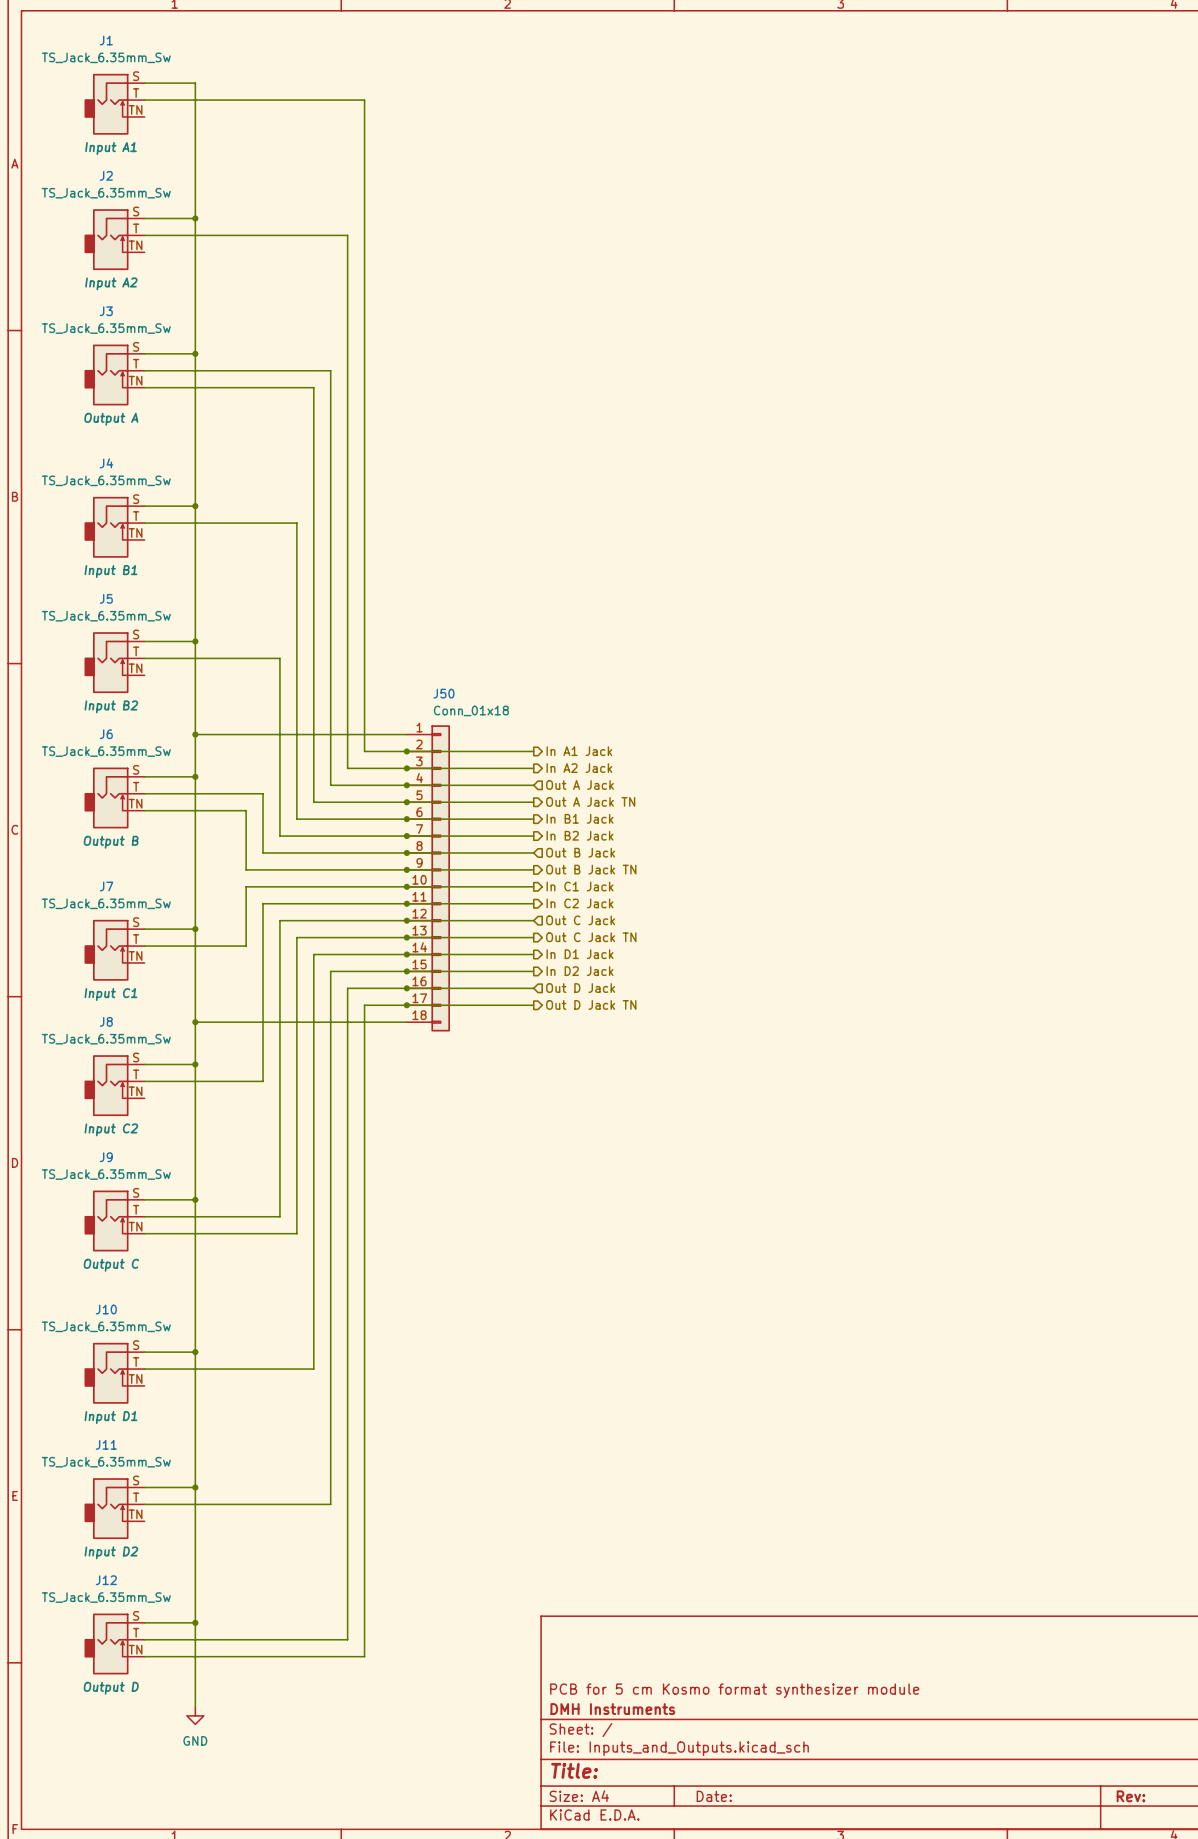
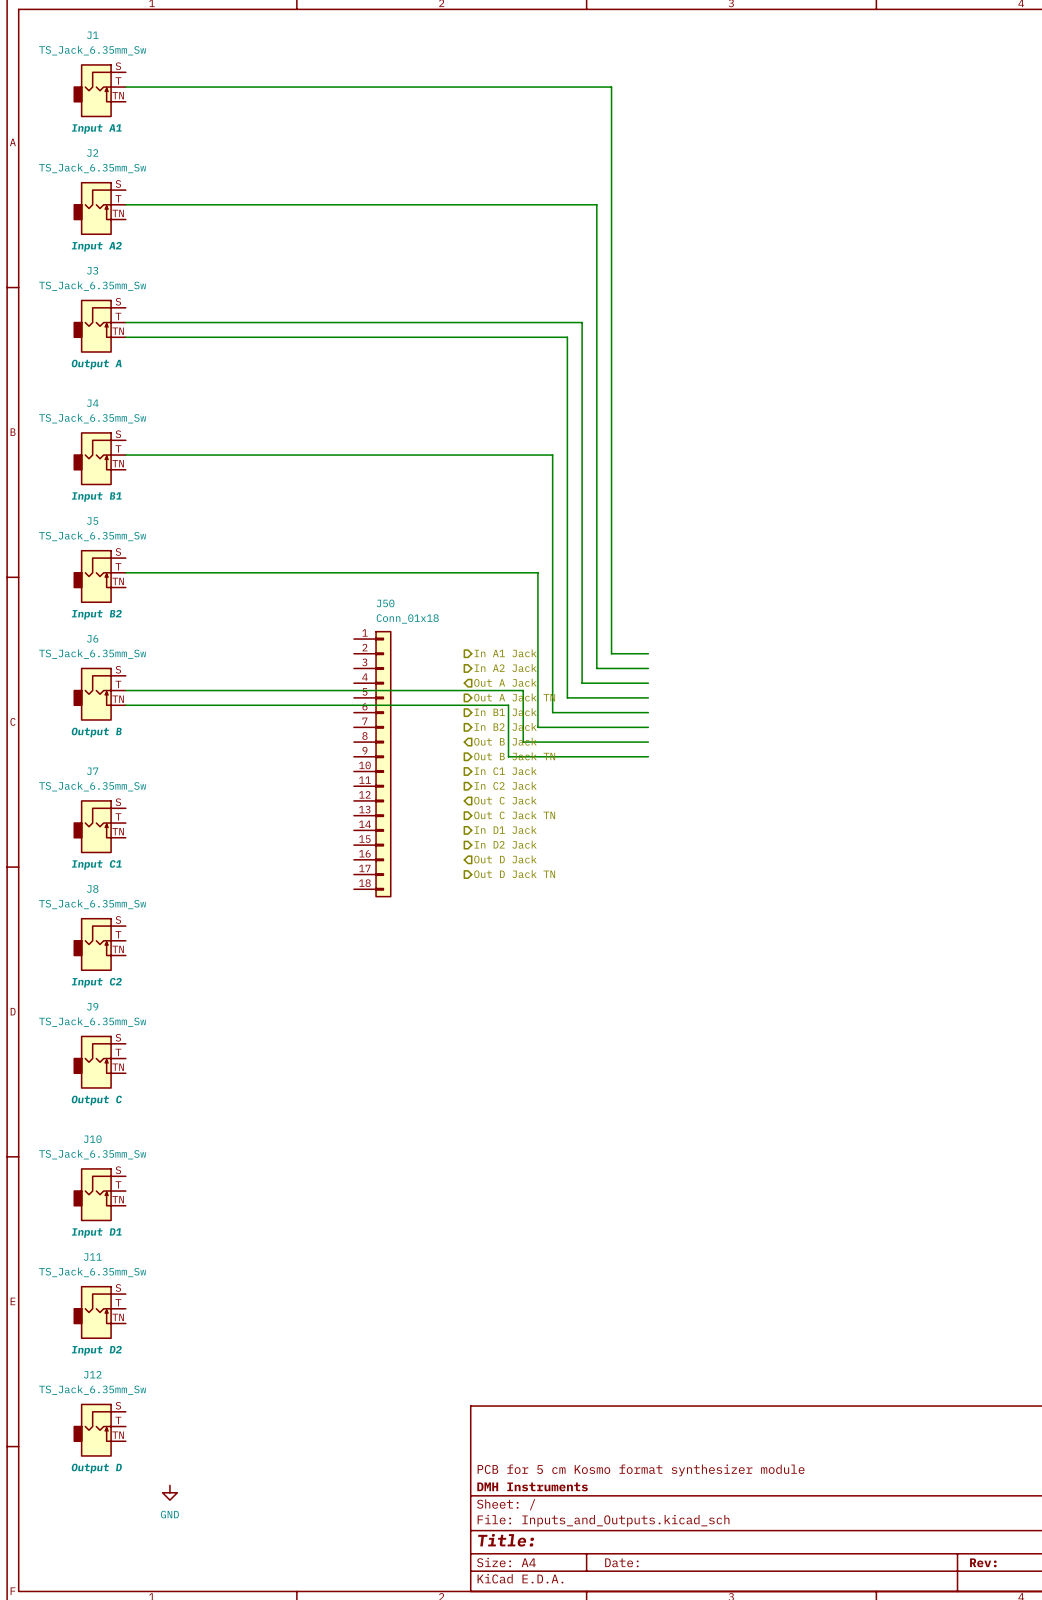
wire: (144, 83) (195, 83) (195, 1707) -> none
wire: (364, 100) (364, 751) (533, 751) -> (317, 87) (611, 87) (611, 653) (648, 653)
wire: (144, 218) (195, 218) -> none
junction: (195, 218) -> none
wire: (347, 235) (347, 768) (533, 768) -> (302, 204) (596, 204) (596, 668) (648, 668)
wire: (144, 353) (195, 353) -> none
junction: (195, 353) -> none
wire: (330, 370) (330, 785) (533, 785) -> (287, 322) (582, 322) (582, 683) (648, 683)
wire: (313, 387) (313, 802) (533, 802) -> (272, 337) (567, 337) (567, 697) (648, 697)
wire: (144, 506) (195, 506) -> none
junction: (195, 506) -> none
wire: (296, 523) (296, 819) (533, 819) -> (258, 455) (552, 455) (552, 712) (648, 712)
wire: (144, 641) (195, 641) -> none
junction: (195, 641) -> none
wire: (279, 658) (279, 836) (533, 836) -> (243, 572) (537, 572) (537, 727) (648, 727)
wire: (195, 734) (406, 734) -> none
junction: (195, 734) -> none
junction: (406, 751) -> none
junction: (406, 768) -> none
wire: (144, 776) (195, 776) -> none
junction: (195, 776) -> none
junction: (406, 785) -> none
wire: (263, 793) (263, 852) (533, 852) -> (228, 690) (523, 690) (523, 742) (648, 742)
junction: (406, 802) -> none
wire: (246, 810) (246, 869) (533, 869) -> (214, 705) (508, 705) (508, 756) (648, 756)
junction: (406, 819) -> none
junction: (406, 836) -> none
junction: (406, 852) -> none
junction: (406, 869) -> none
junction: (406, 886) -> none
wire: (533, 886) (246, 886) (246, 946) (144, 946) -> none
junction: (406, 903) -> none
wire: (533, 903) (263, 903) (263, 1081) (144, 1081) -> none
junction: (406, 920) -> none
wire: (533, 920) (279, 920) (279, 1216) (144, 1216) -> none
wire: (144, 929) (195, 929) -> none
junction: (195, 929) -> none
junction: (406, 937) -> none
wire: (533, 937) (296, 937) (296, 1233) (144, 1233) -> none
junction: (406, 954) -> none
wire: (533, 954) (313, 954) (313, 1369) (144, 1369) -> none
junction: (406, 971) -> none
wire: (533, 971) (330, 971) (330, 1504) (144, 1504) -> none
junction: (406, 988) -> none
wire: (533, 988) (347, 988) (347, 1639) (144, 1639) -> none
junction: (406, 1005) -> none
wire: (533, 1005) (364, 1005) (364, 1656) (144, 1656) -> none
wire: (195, 1022) (406, 1022) -> none
junction: (195, 1022) -> none
wire: (144, 1064) (195, 1064) -> none
junction: (195, 1064) -> none
wire: (144, 1199) (195, 1199) -> none
junction: (195, 1199) -> none
wire: (144, 1352) (195, 1352) -> none
junction: (195, 1352) -> none
wire: (144, 1487) (195, 1487) -> none
junction: (195, 1487) -> none
wire: (144, 1622) (195, 1622) -> none
junction: (195, 1622) -> none

